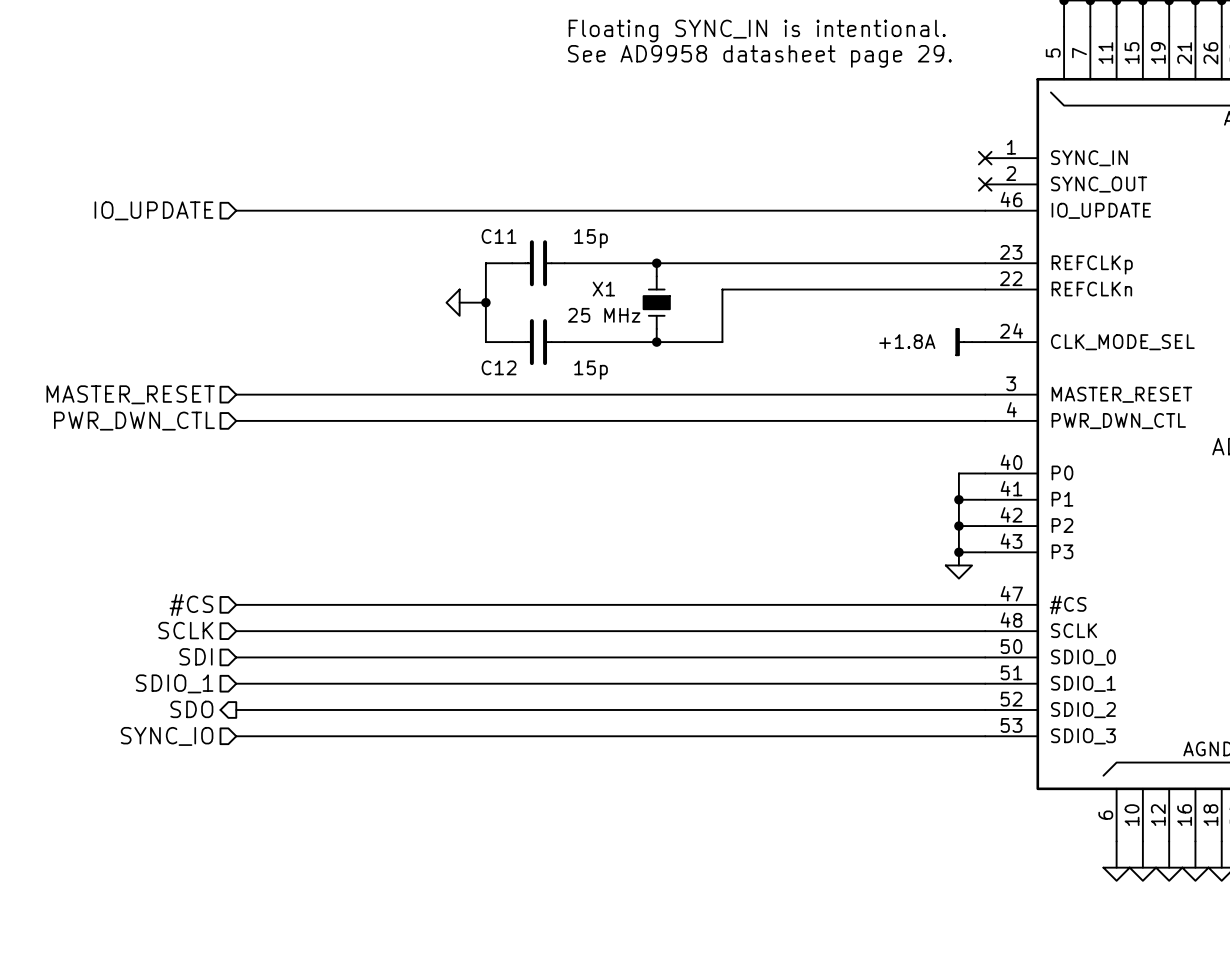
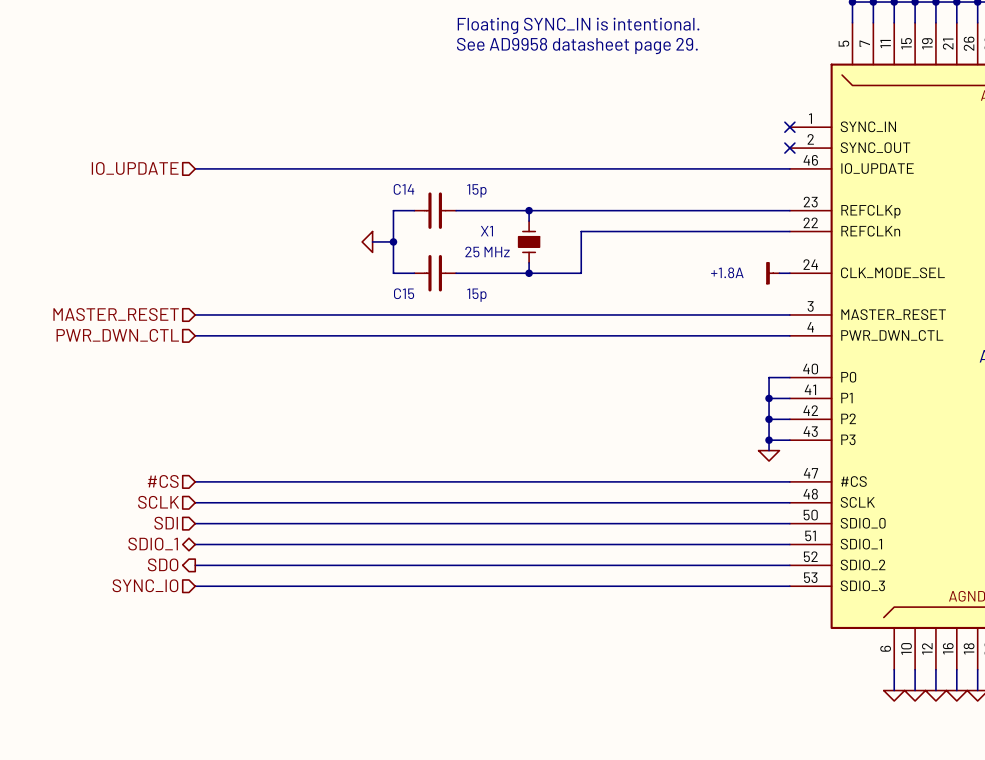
C11 name: C11 (499, 236) -> C14 (403, 189)
C12 name: C12 (499, 367) -> C15 (404, 293)
hierarchical label shape: input (174, 683) -> bidirectional (153, 544)

